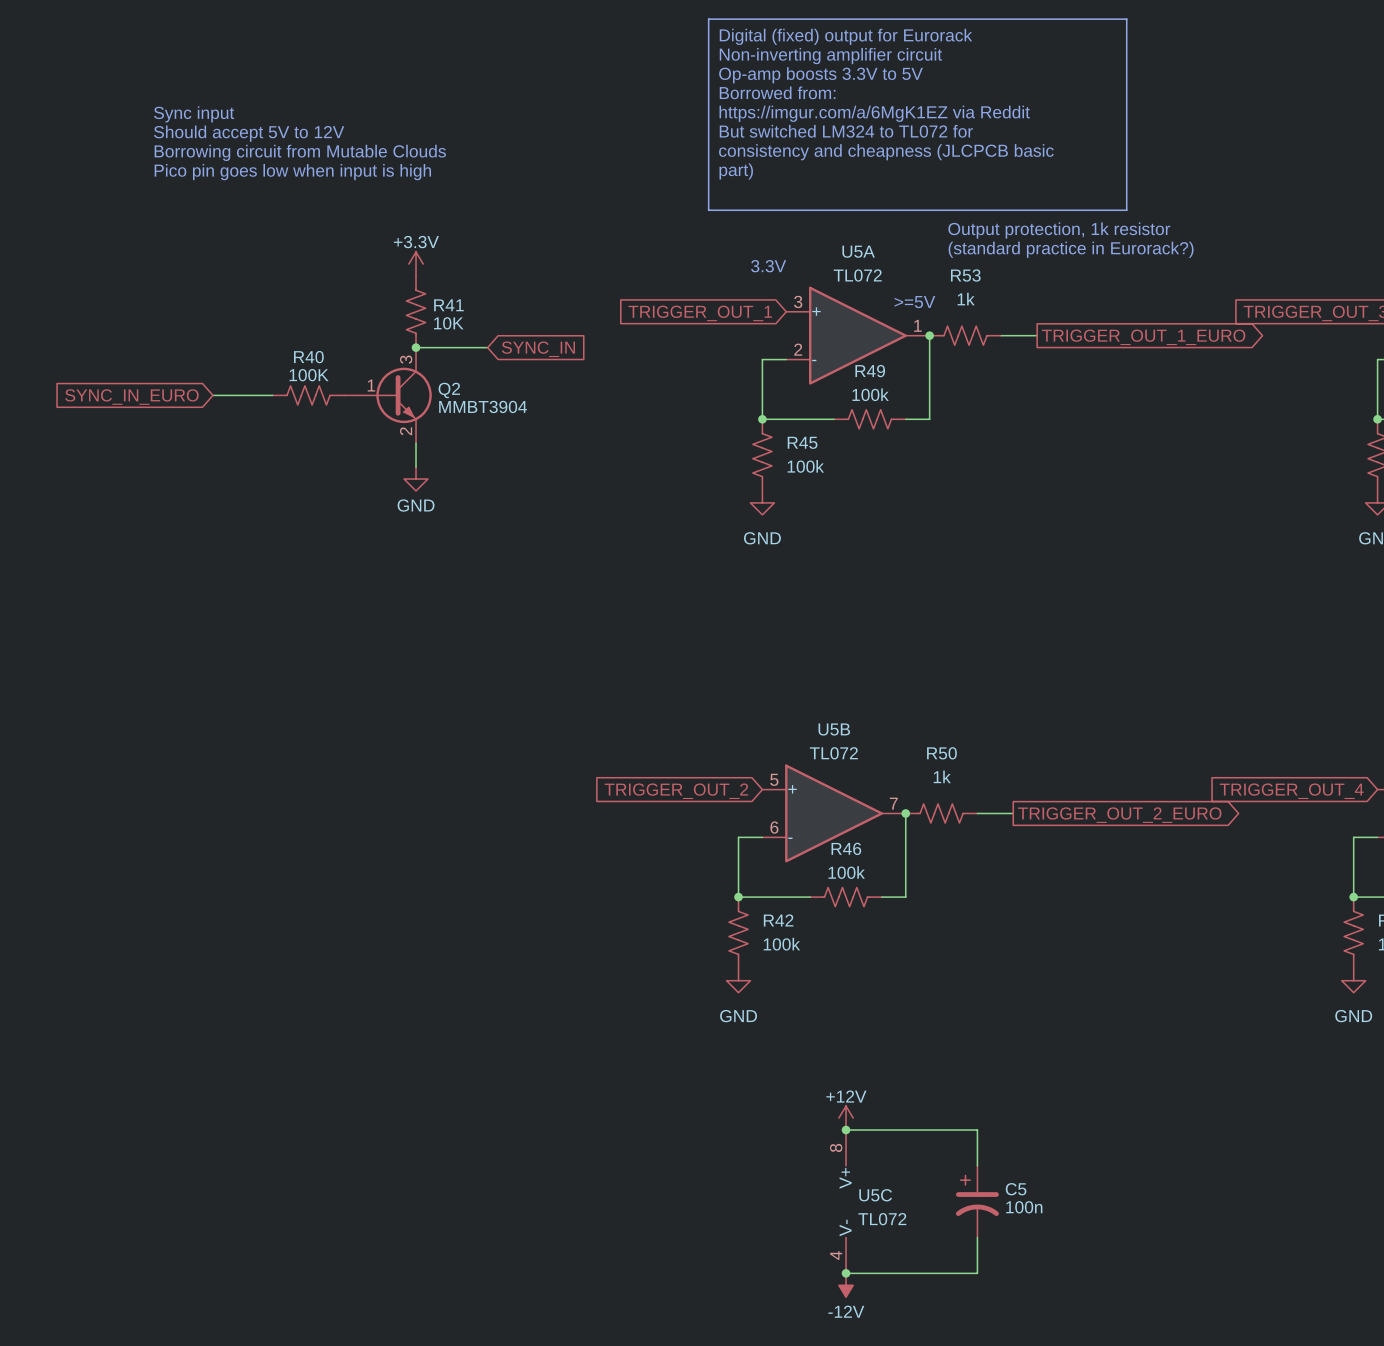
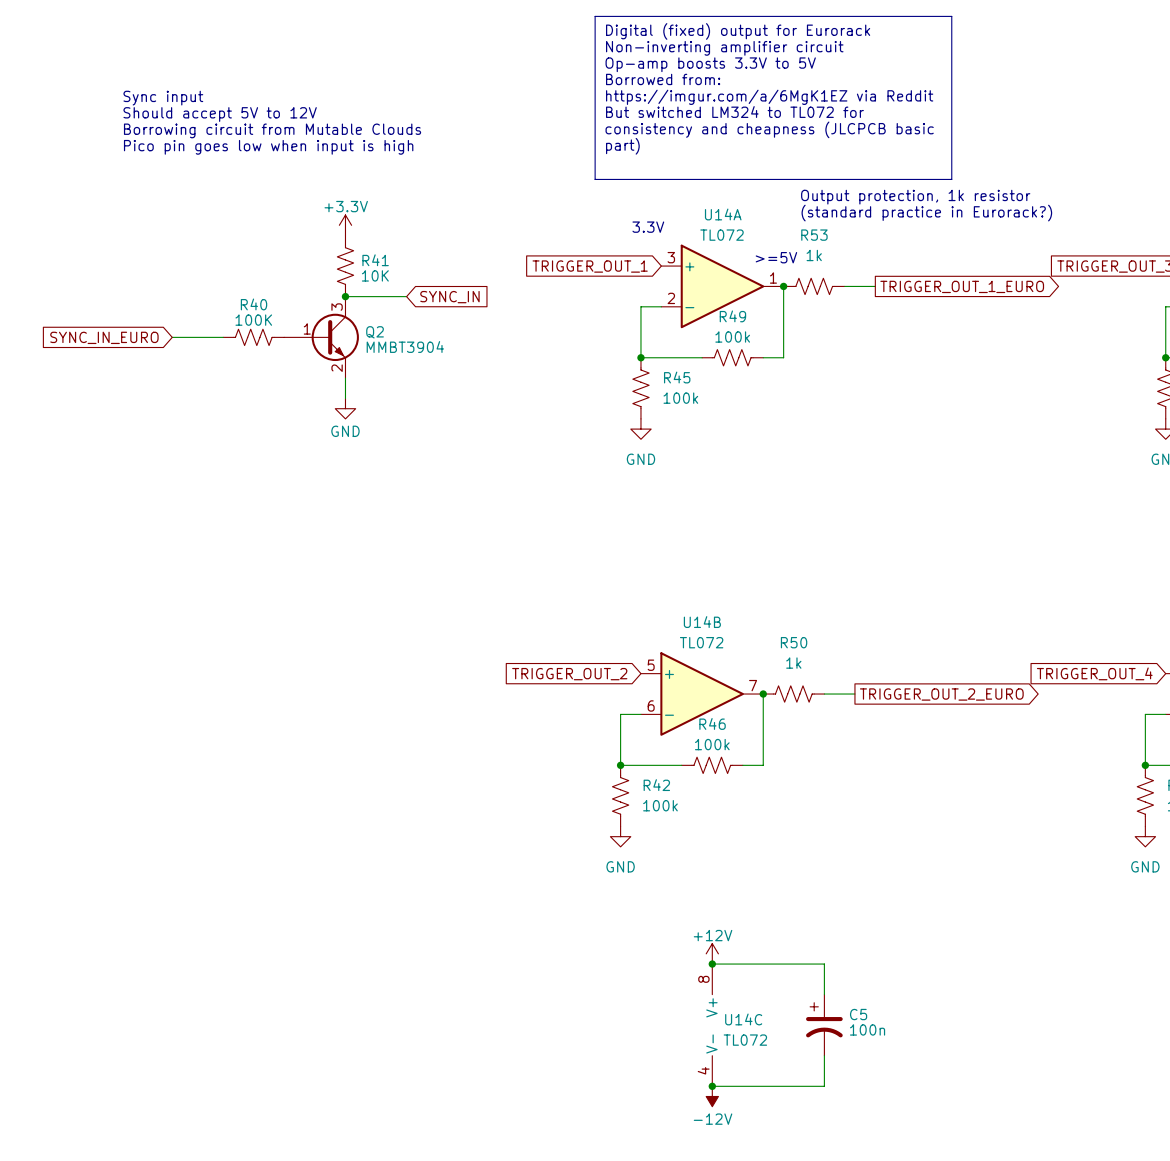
U5A name: U5A (858, 251) -> U14A (723, 214)
U5B name: U5B (834, 729) -> U14B (702, 622)
U5C name: U5C (875, 1195) -> U14C (743, 1019)

